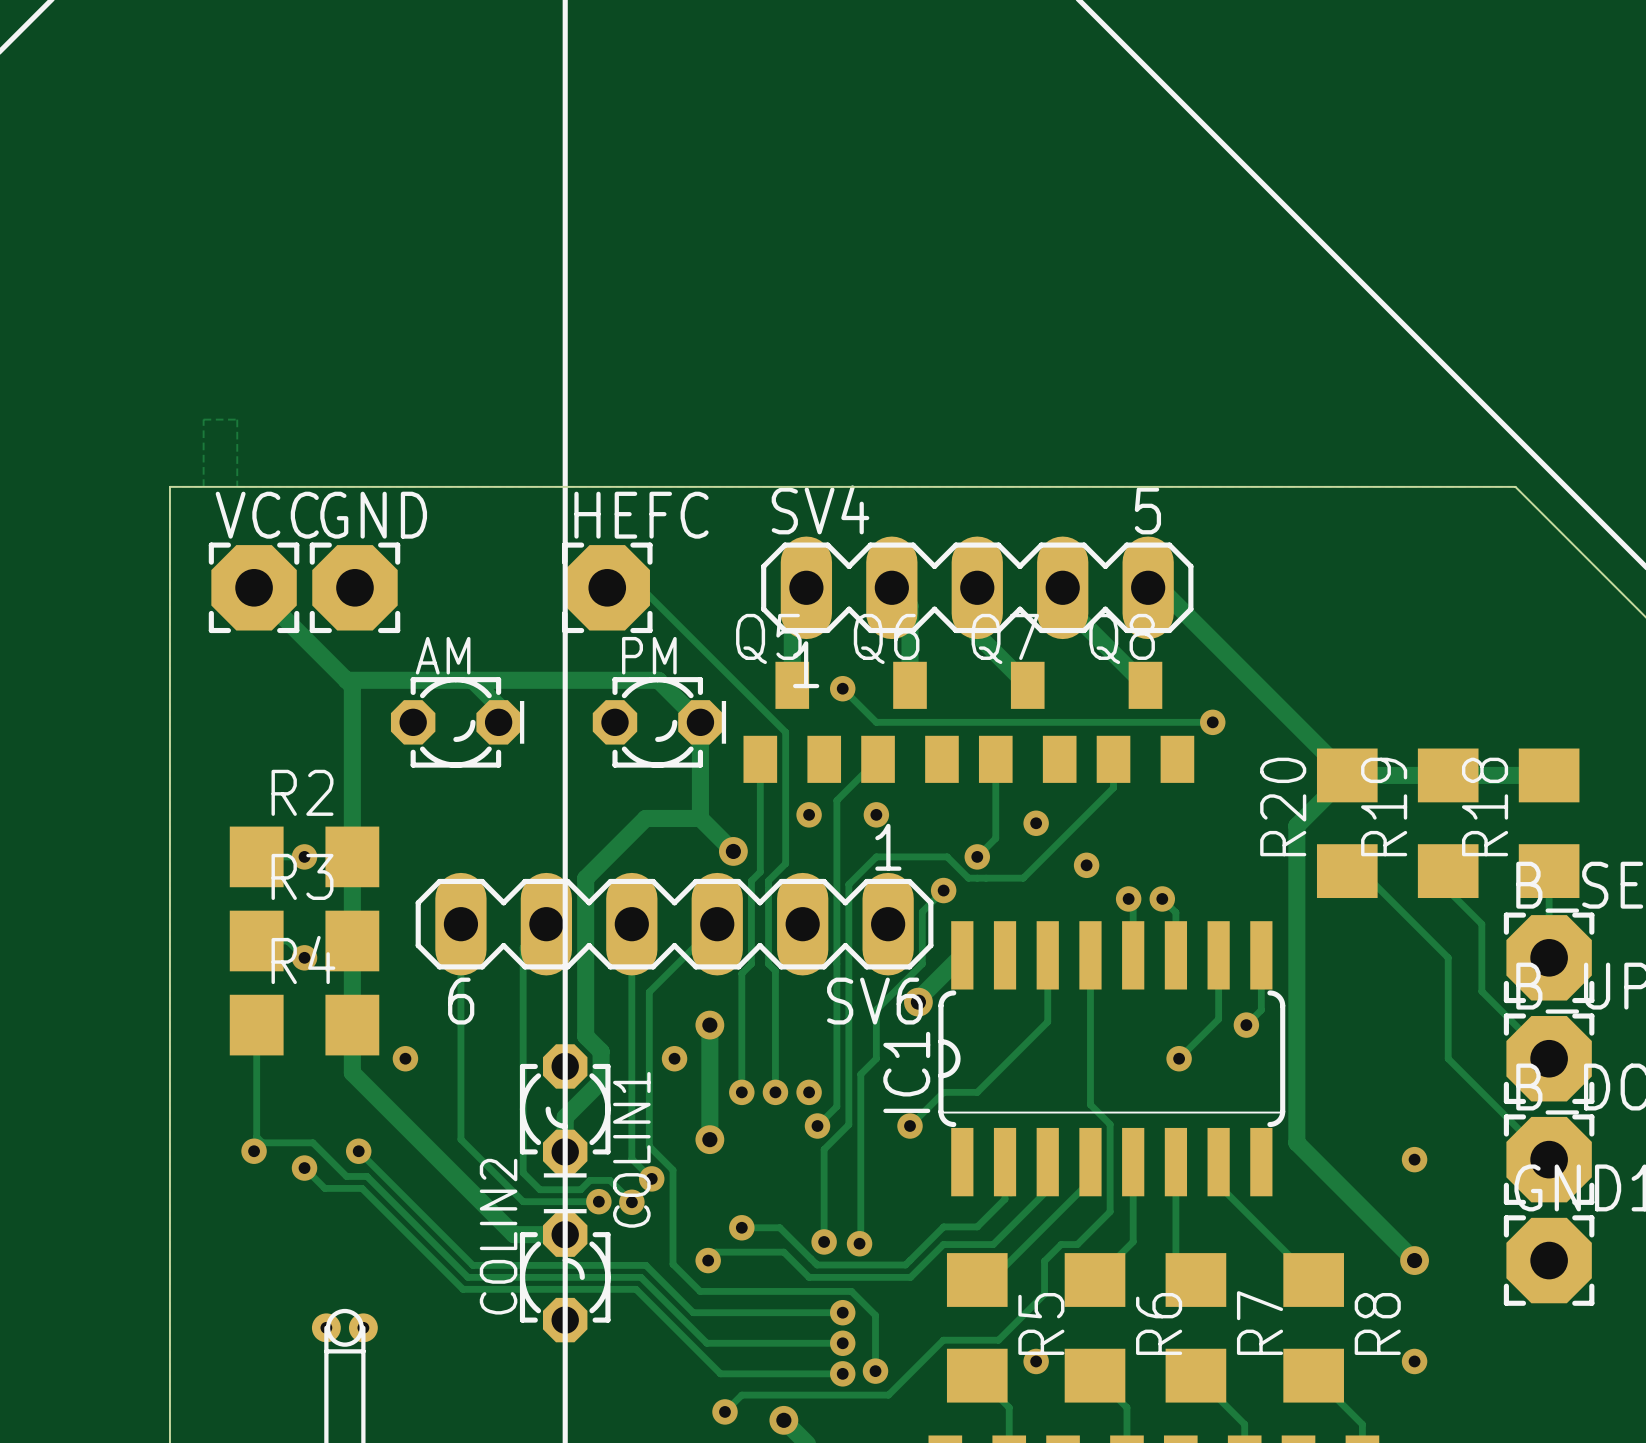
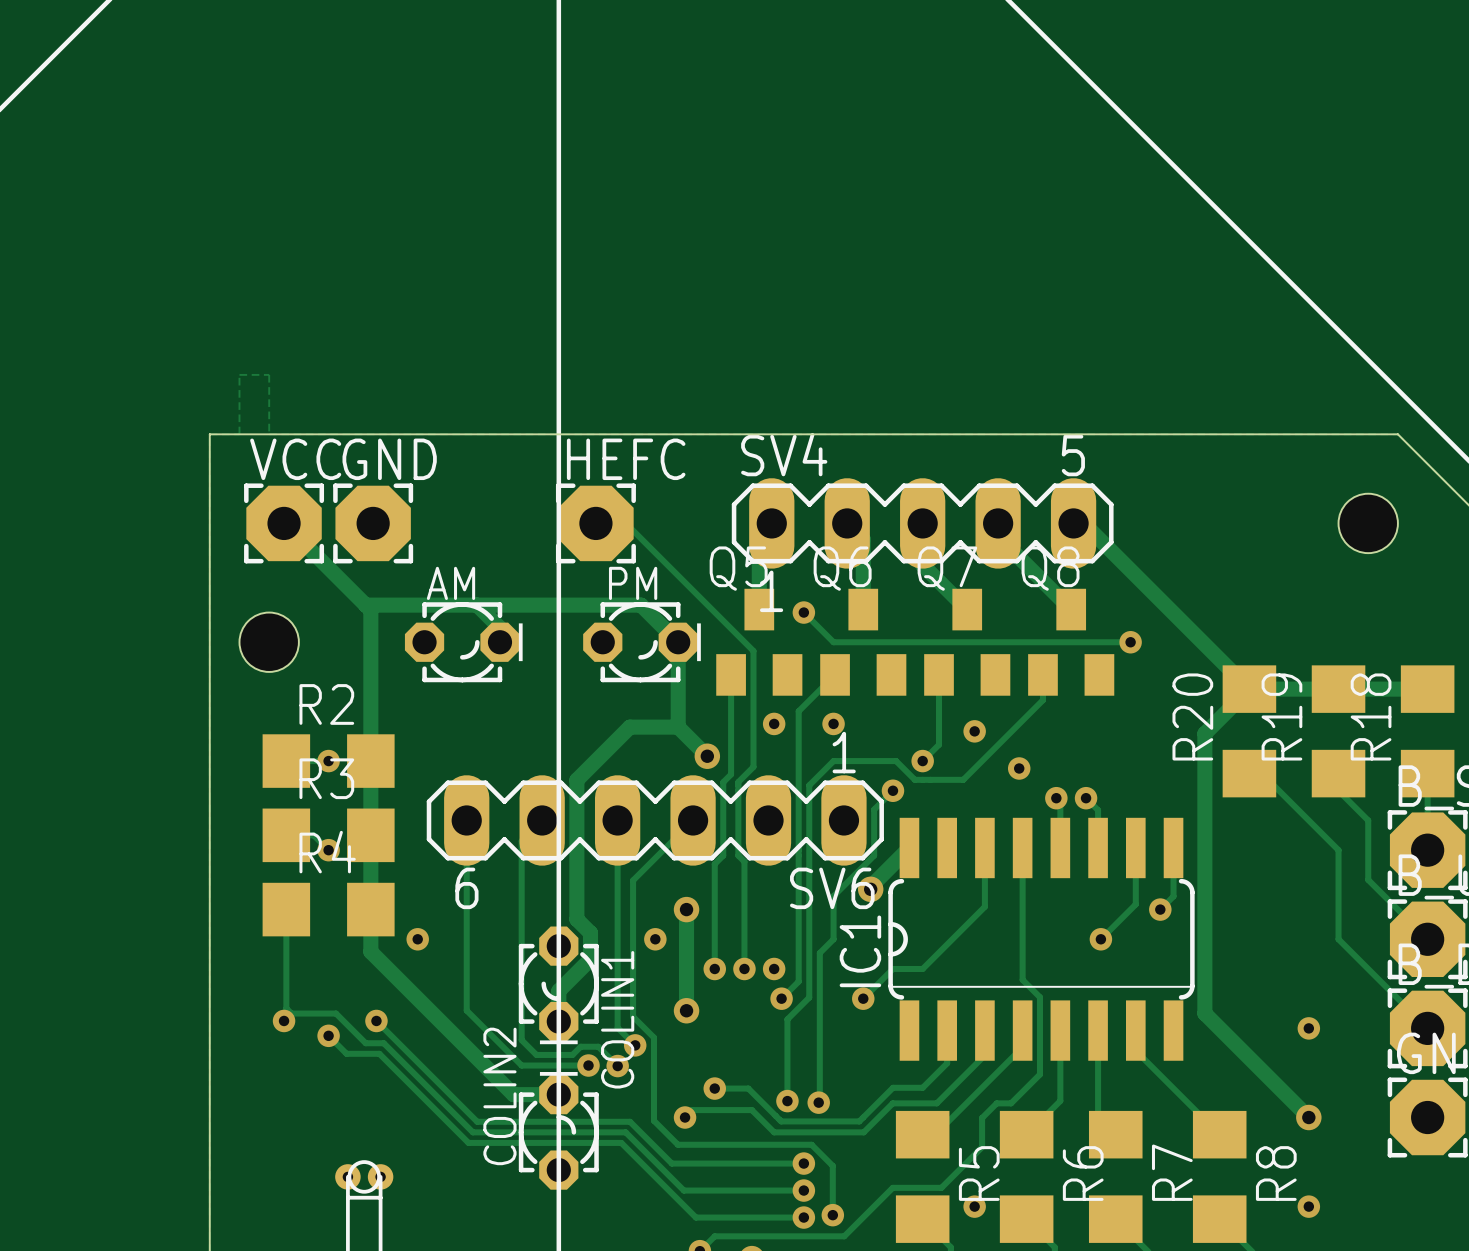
hole: none -> (1368, 523)
hole: none -> (269, 642)

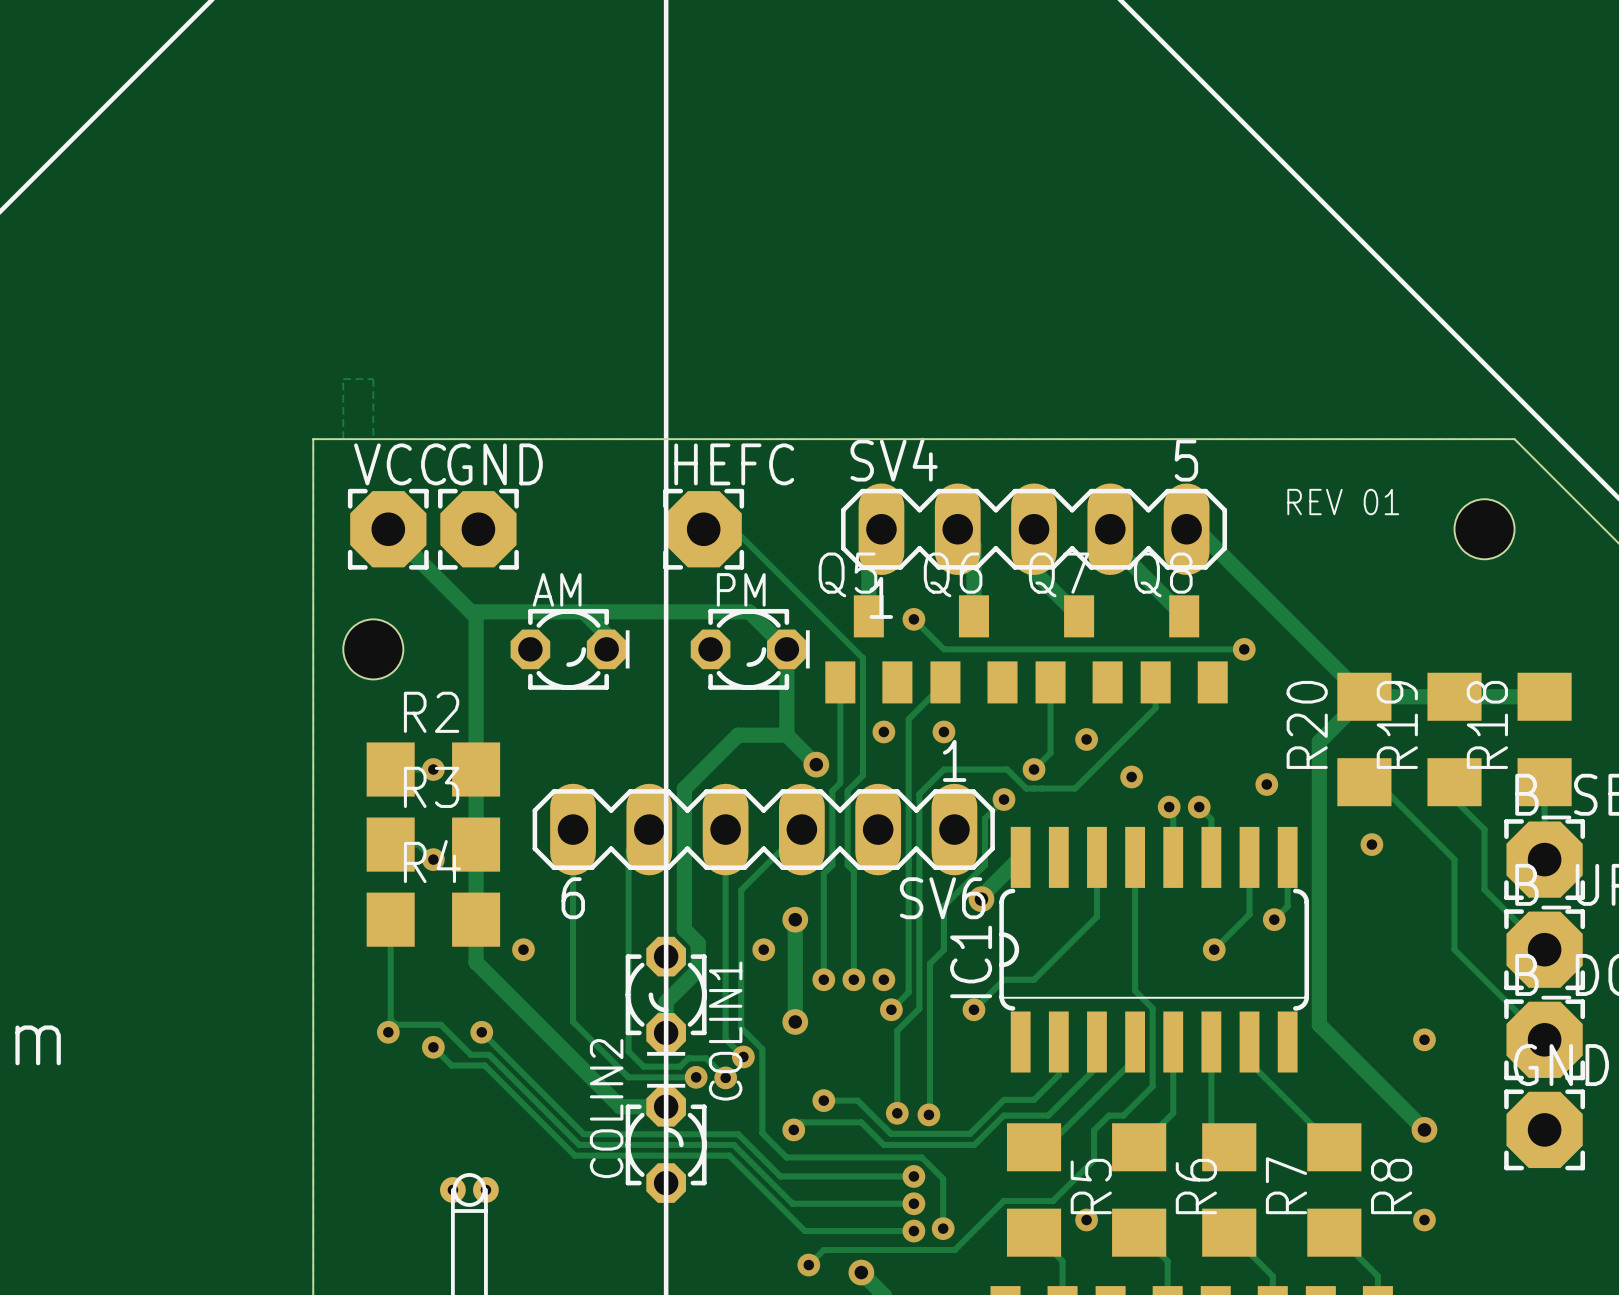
text: none -> REV 01 (1343, 502)
via: none -> (1266, 784)
via: none -> (1371, 844)

